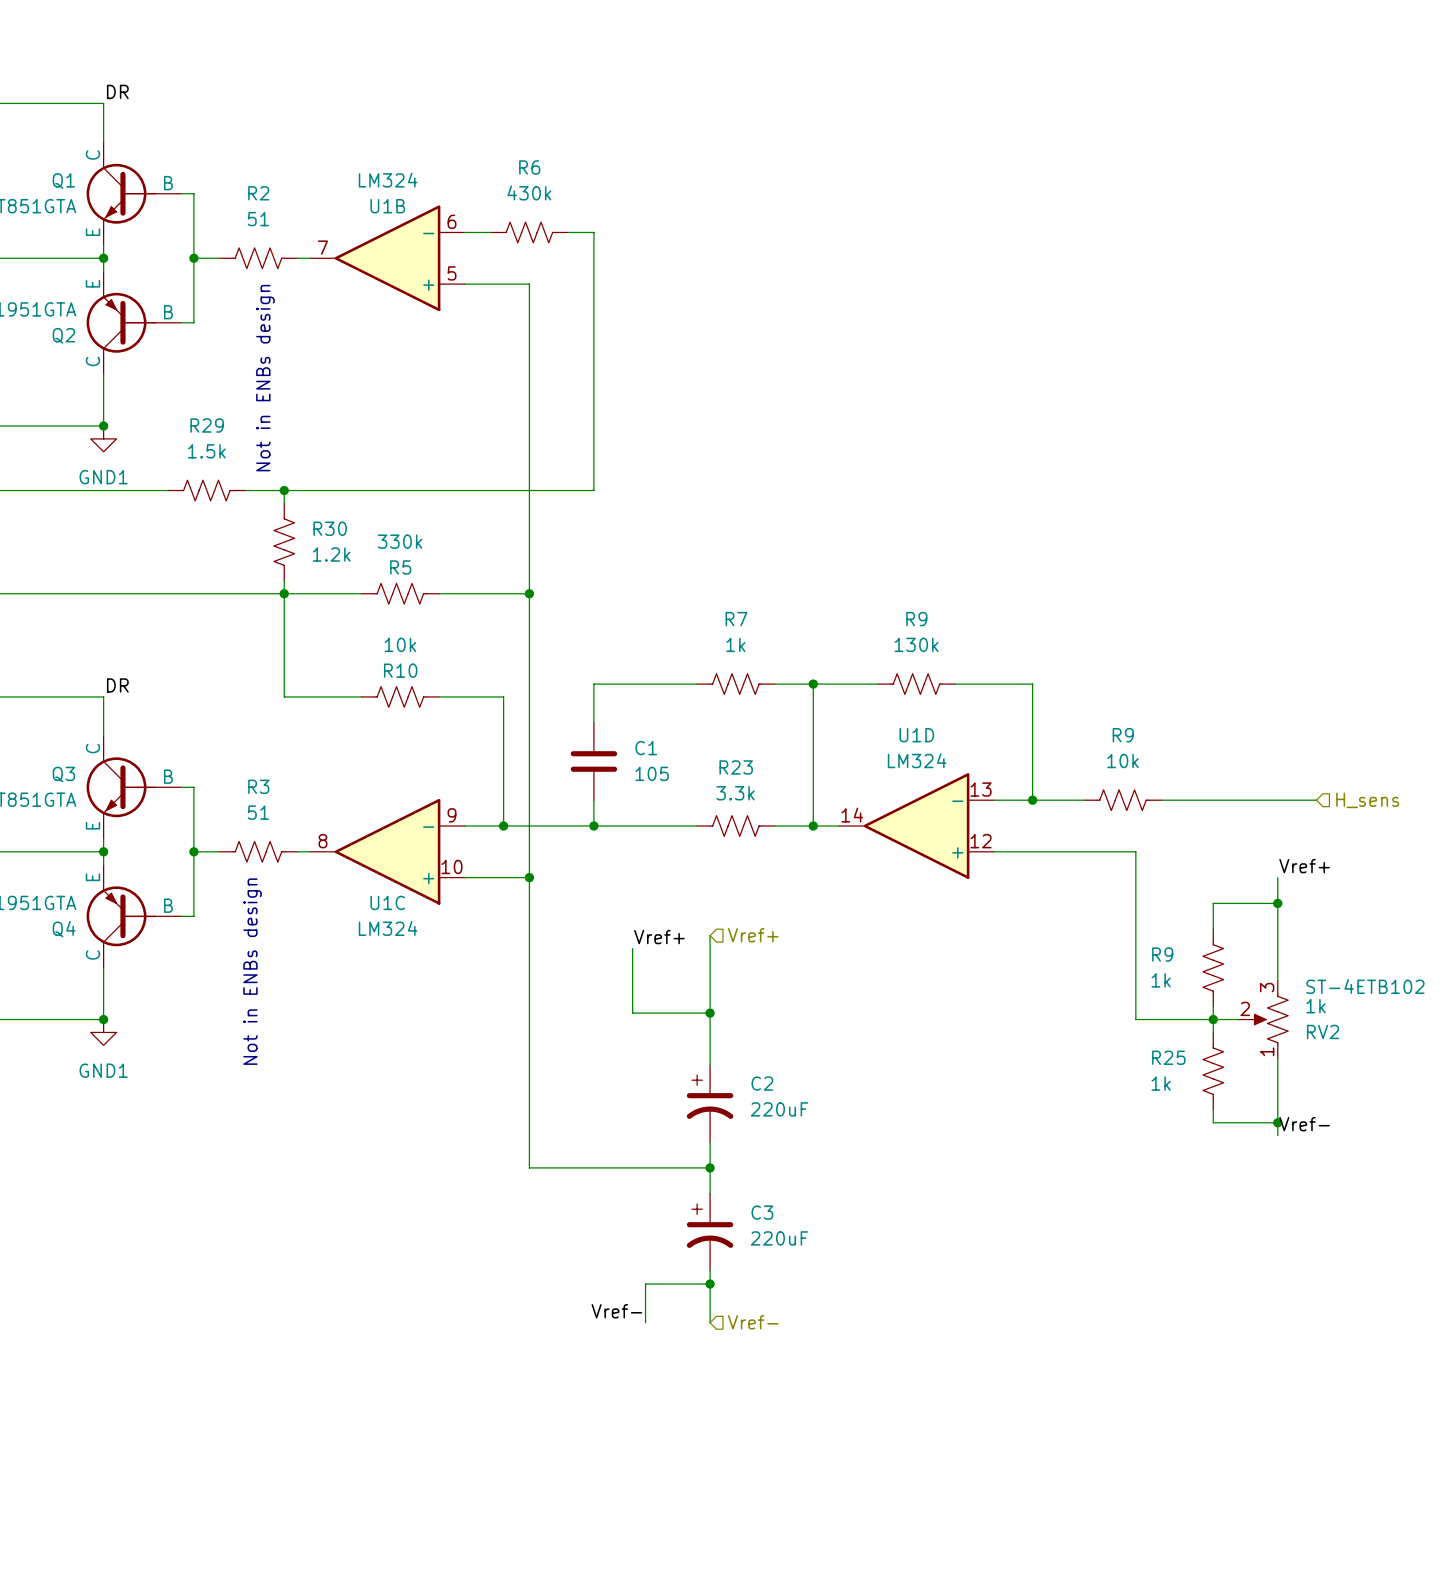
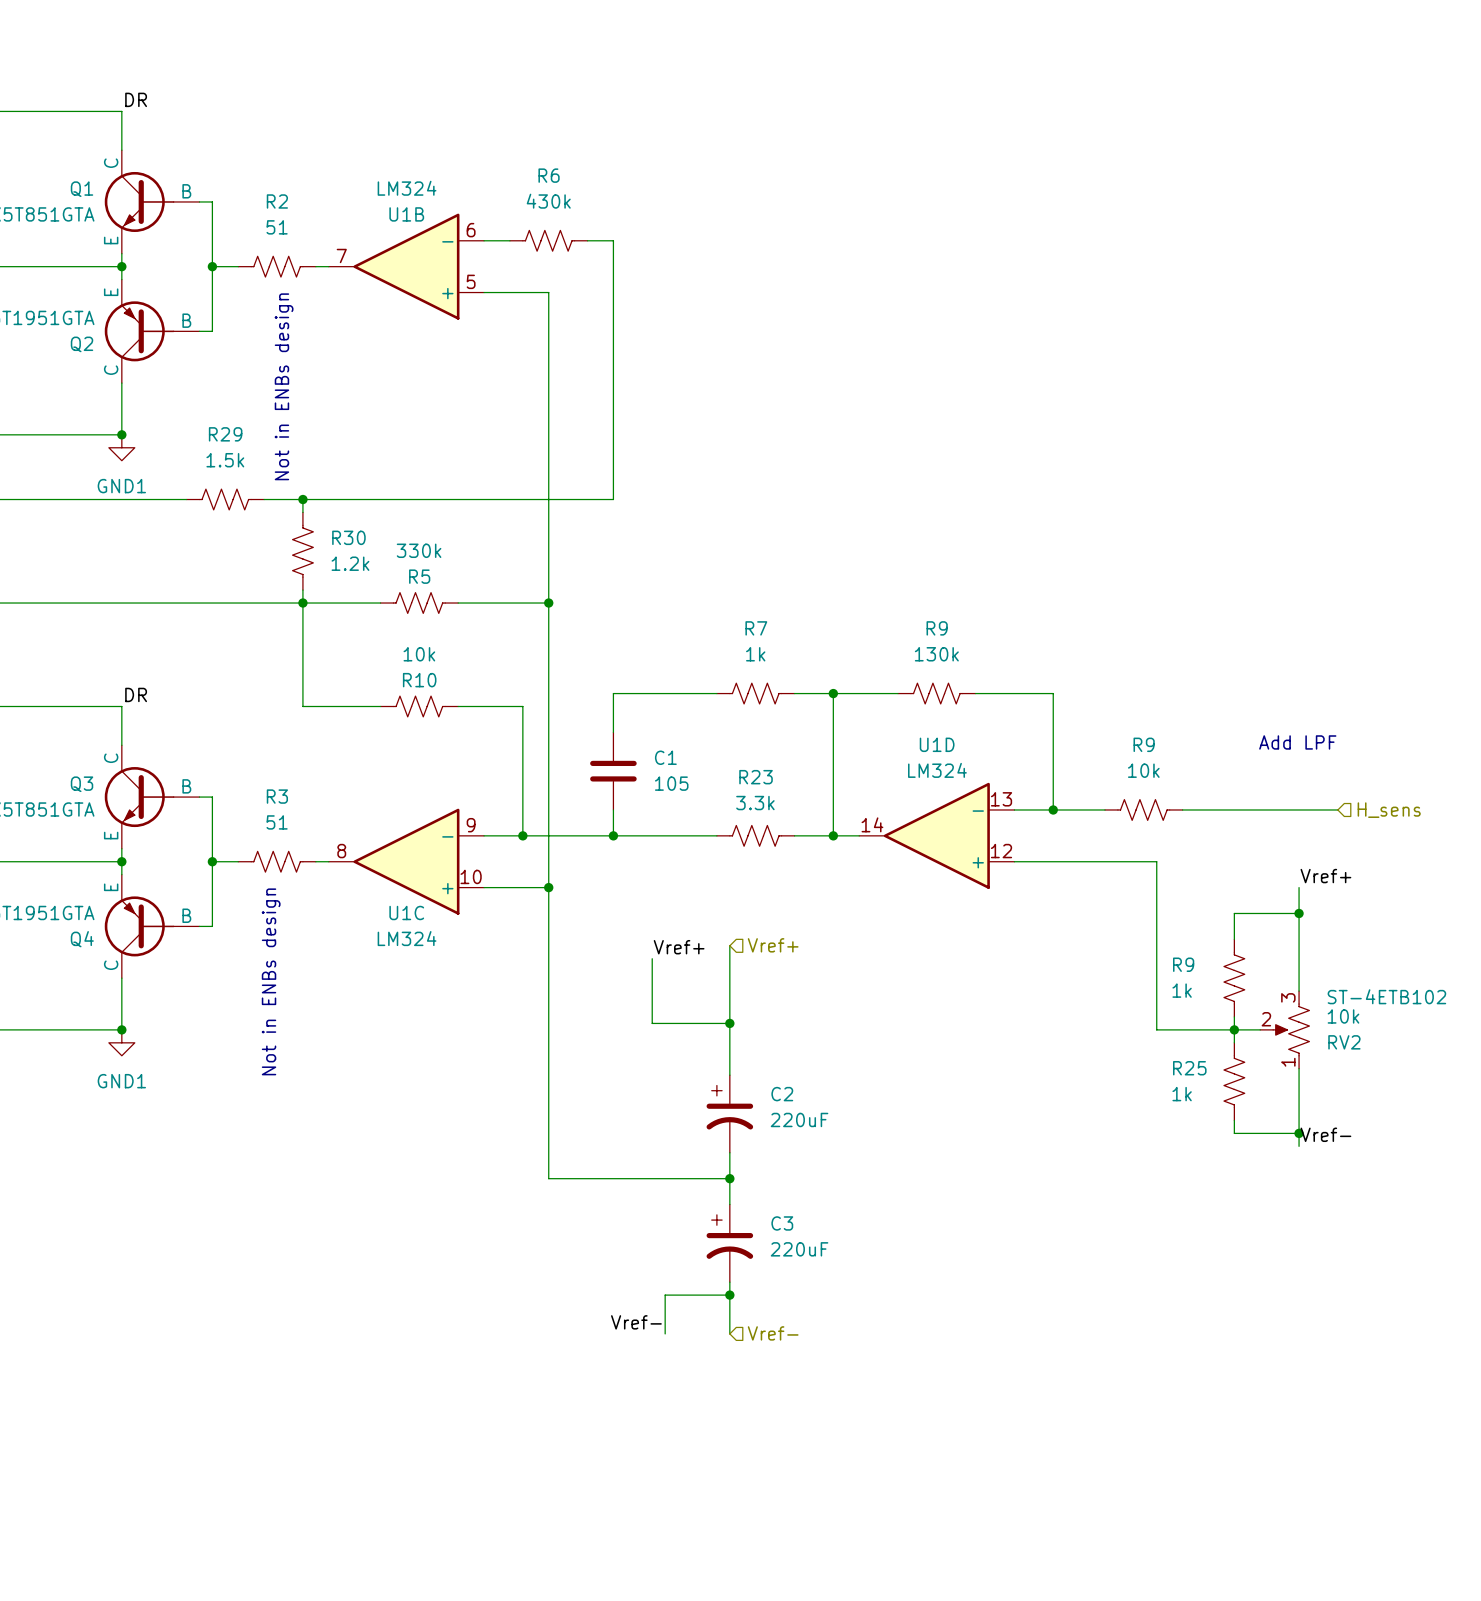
text: none -> Add LPF (1297, 742)
RV2 value: 1k (1315, 1006) -> 10k (1343, 1016)

